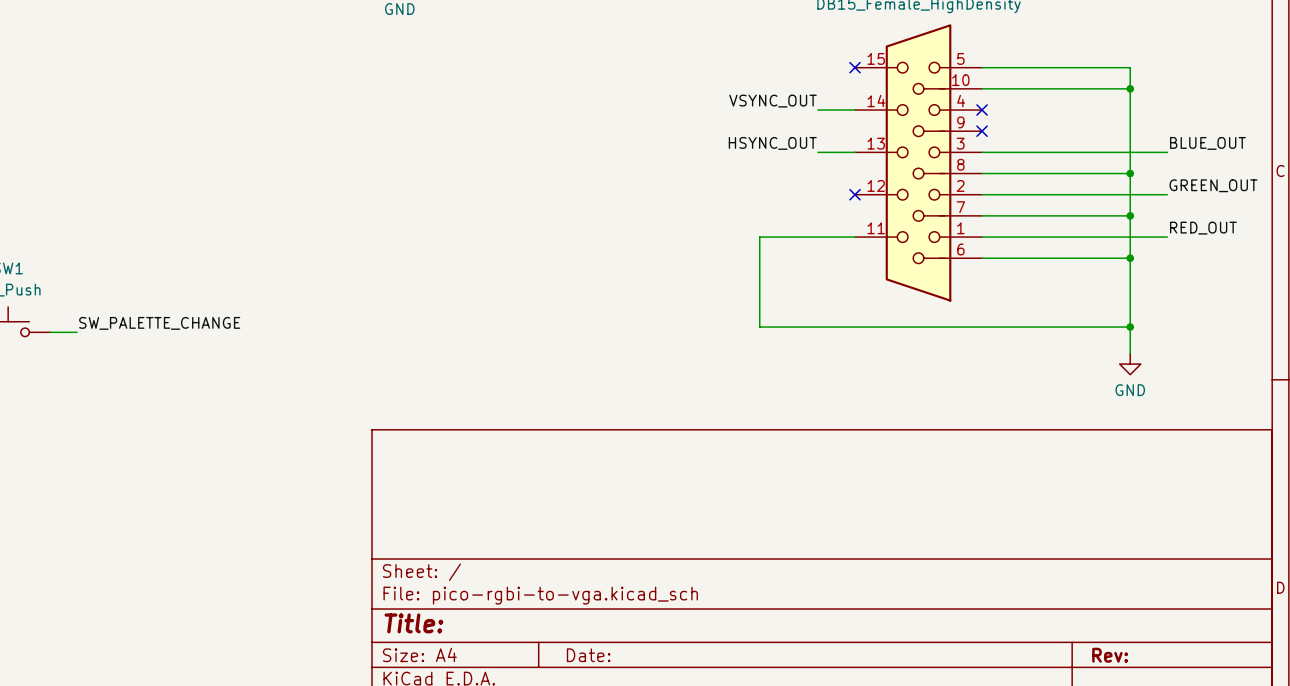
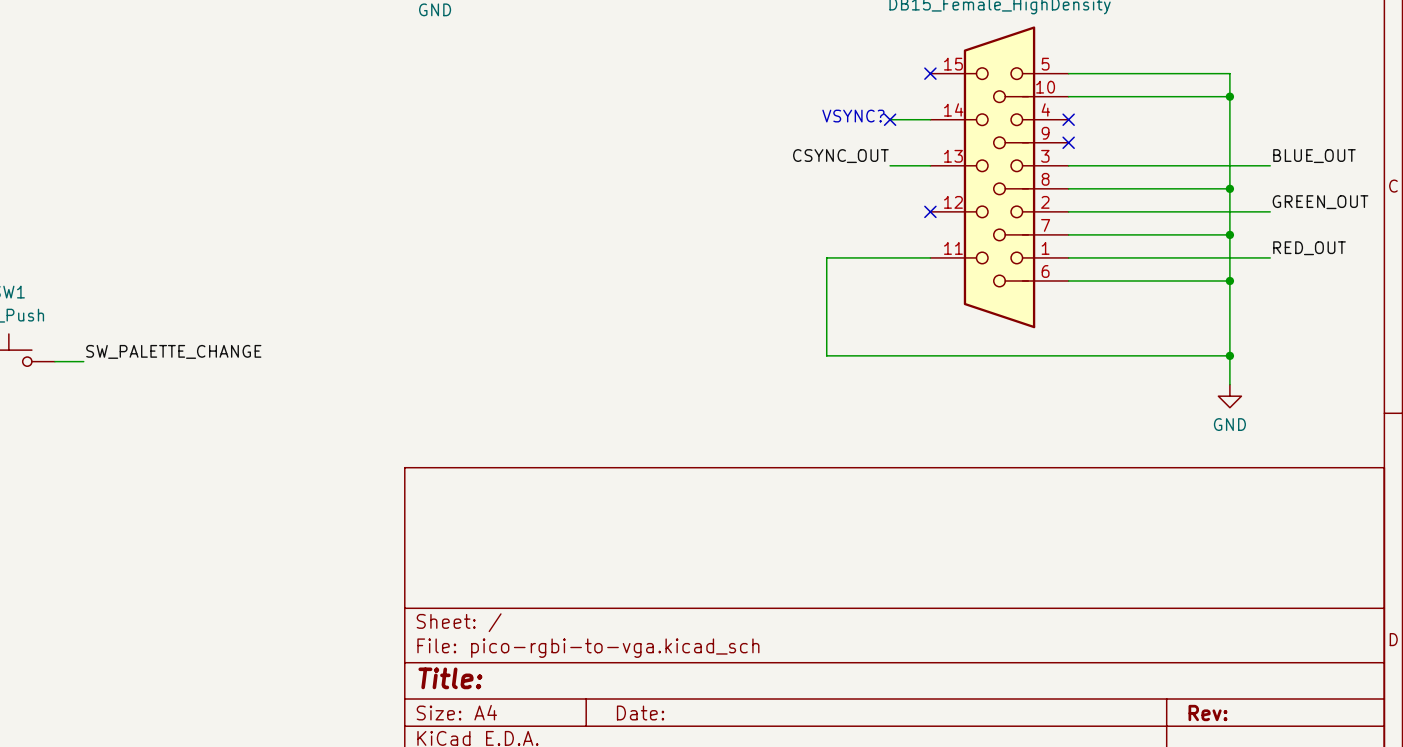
label: VSYNC_OUT (773, 101) -> none
text: none -> VSYNC? (853, 116)
no-connect mark: none -> (890, 119)
label: HSYNC_OUT (772, 143) -> CSYNC_OUT (840, 156)

